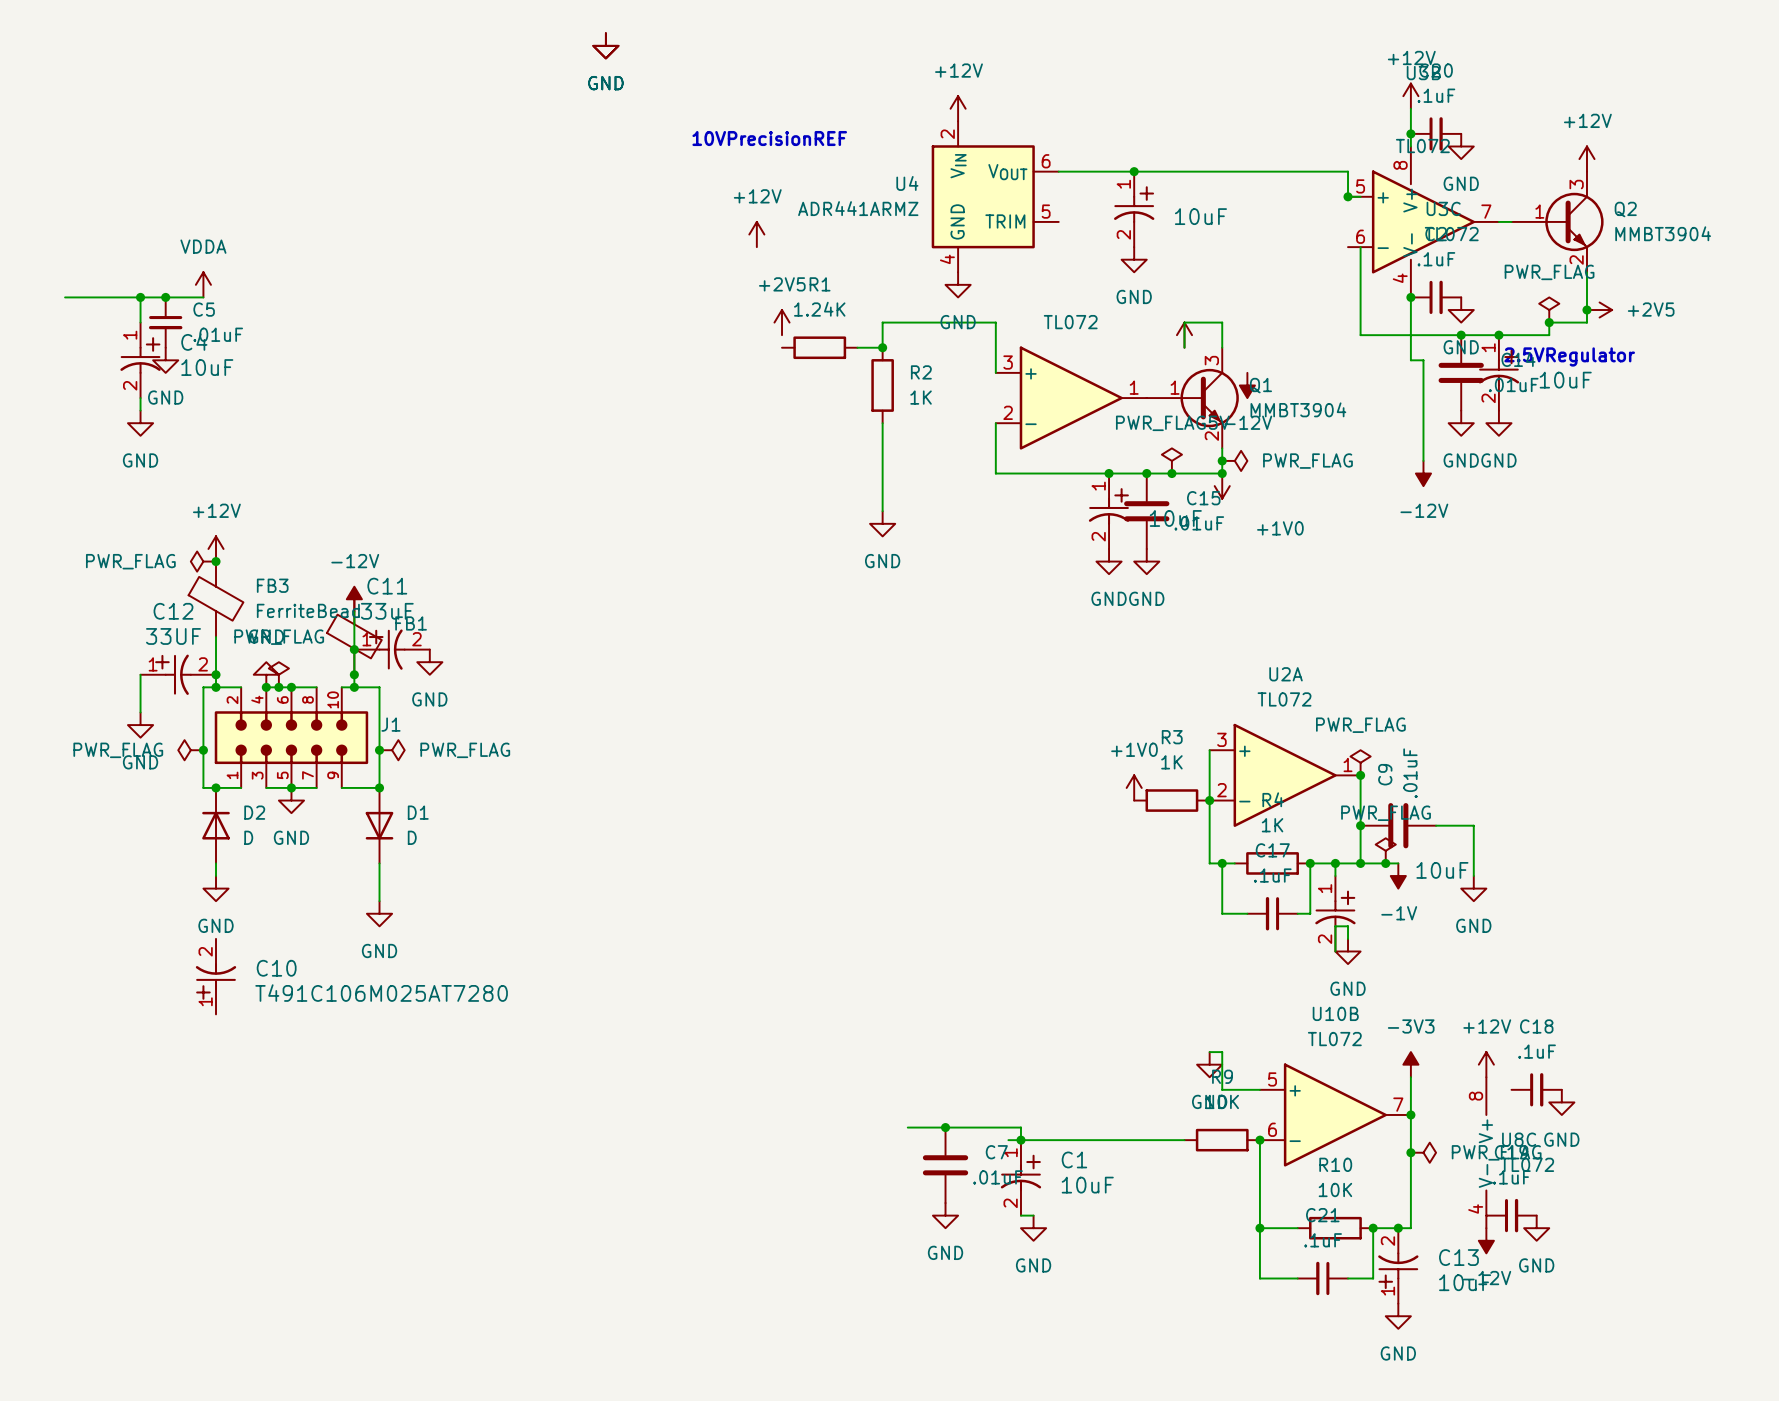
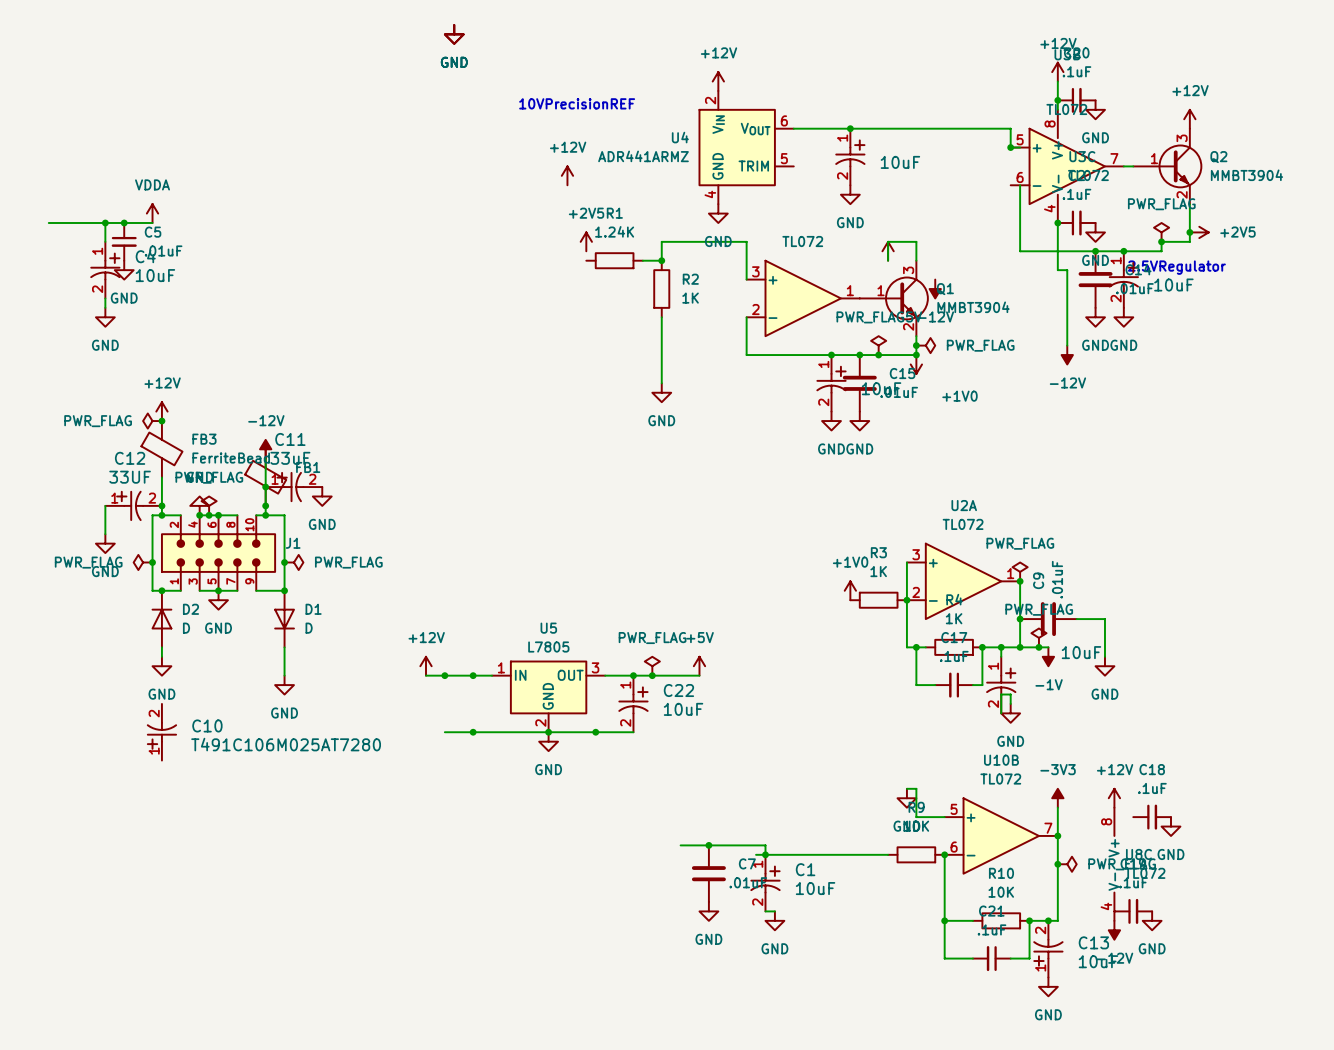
power symbol: none -> +12V (426, 666)
power symbol: none -> PWR_FLAG (652, 666)
power symbol: none -> +5V (699, 666)
wire: none -> (426, 675) (492, 675)
junction: none -> (444, 675)
junction: none -> (473, 675)
wire: none -> (605, 675) (699, 675)
junction: none -> (633, 675)
junction: none -> (652, 675)
U5: none -> L7805 (548, 696)
C22: none -> 10uF (633, 703)
wire: none -> (444, 732) (633, 732)
junction: none -> (473, 732)
junction: none -> (548, 732)
junction: none -> (595, 732)
power symbol: none -> GND (548, 741)

